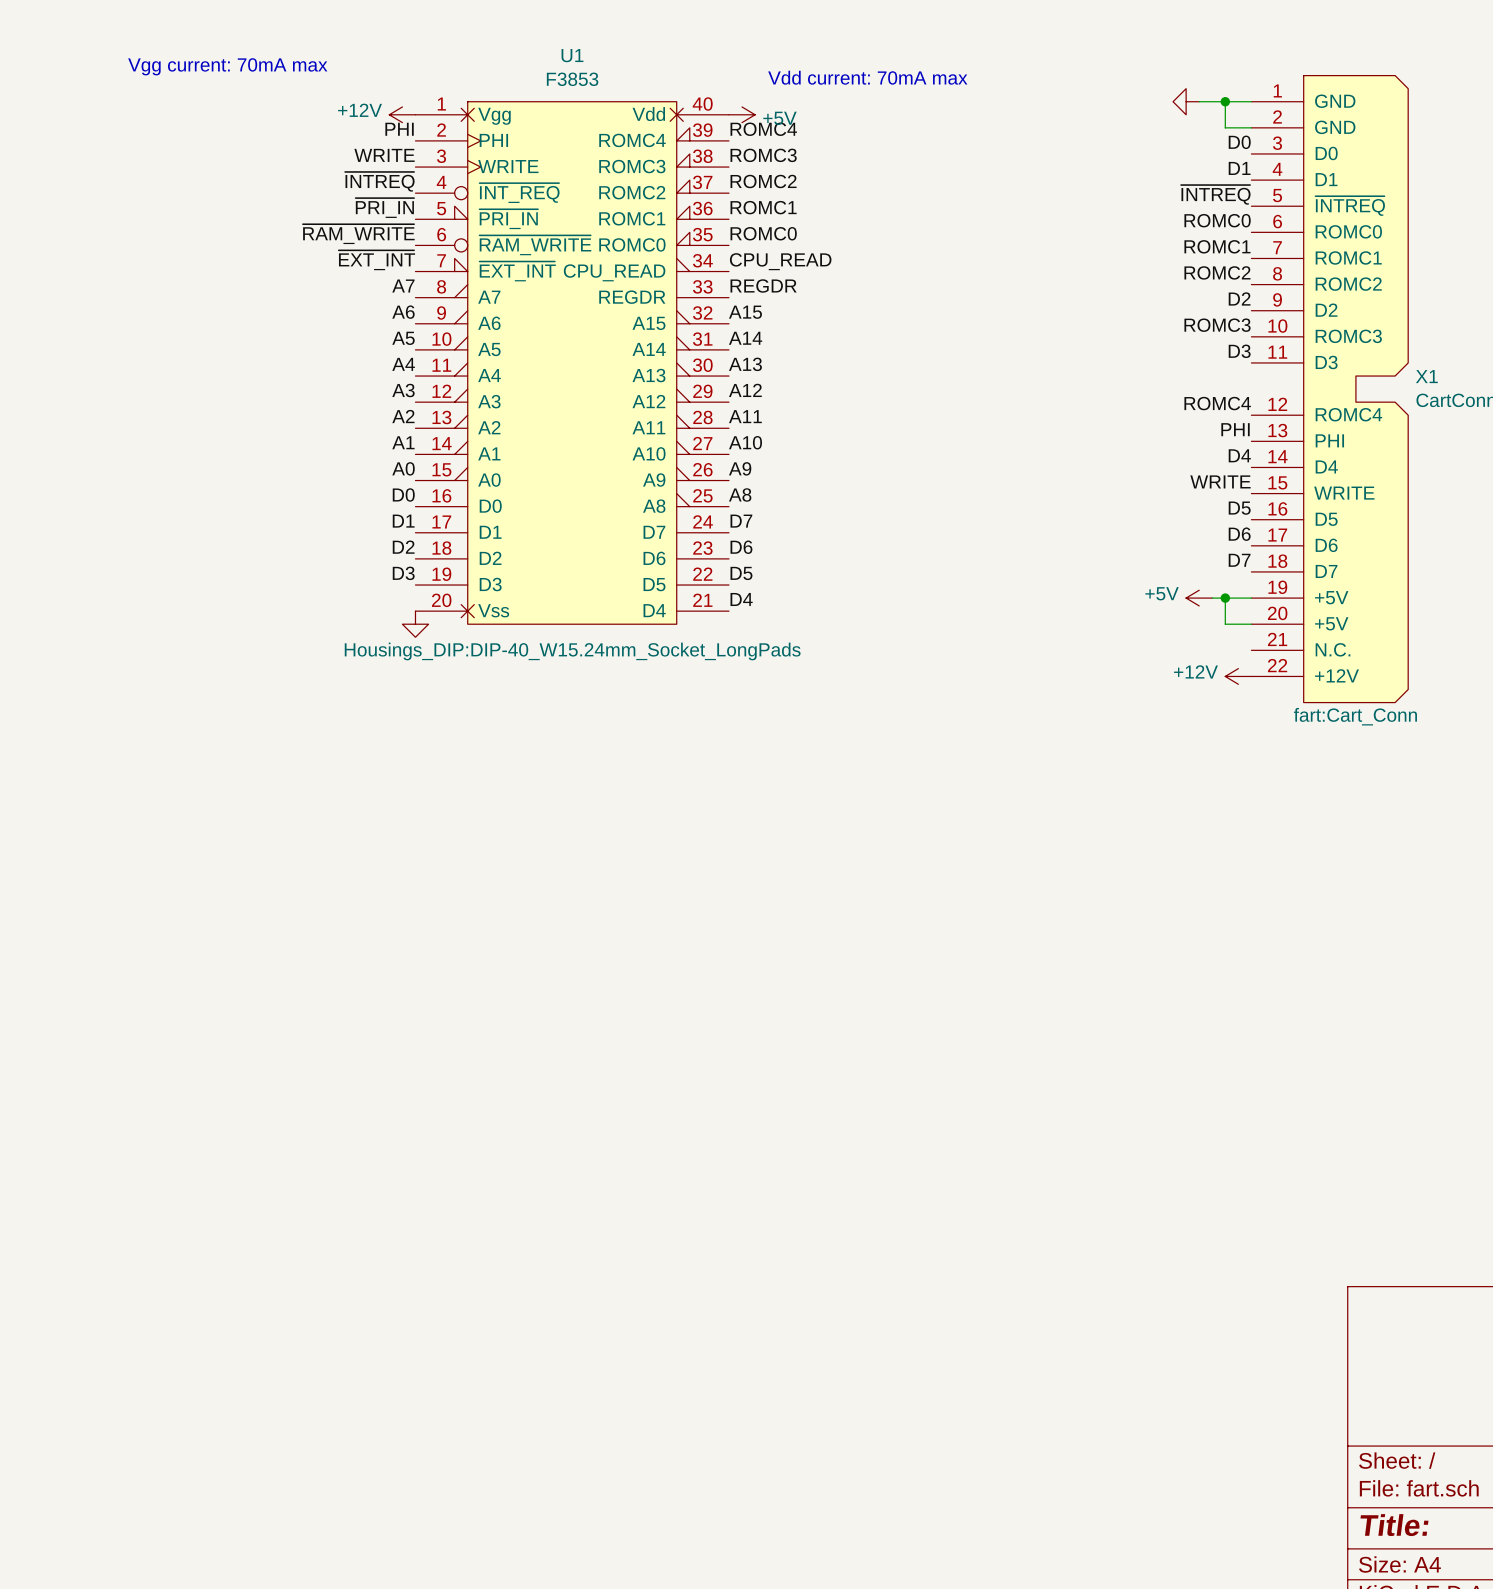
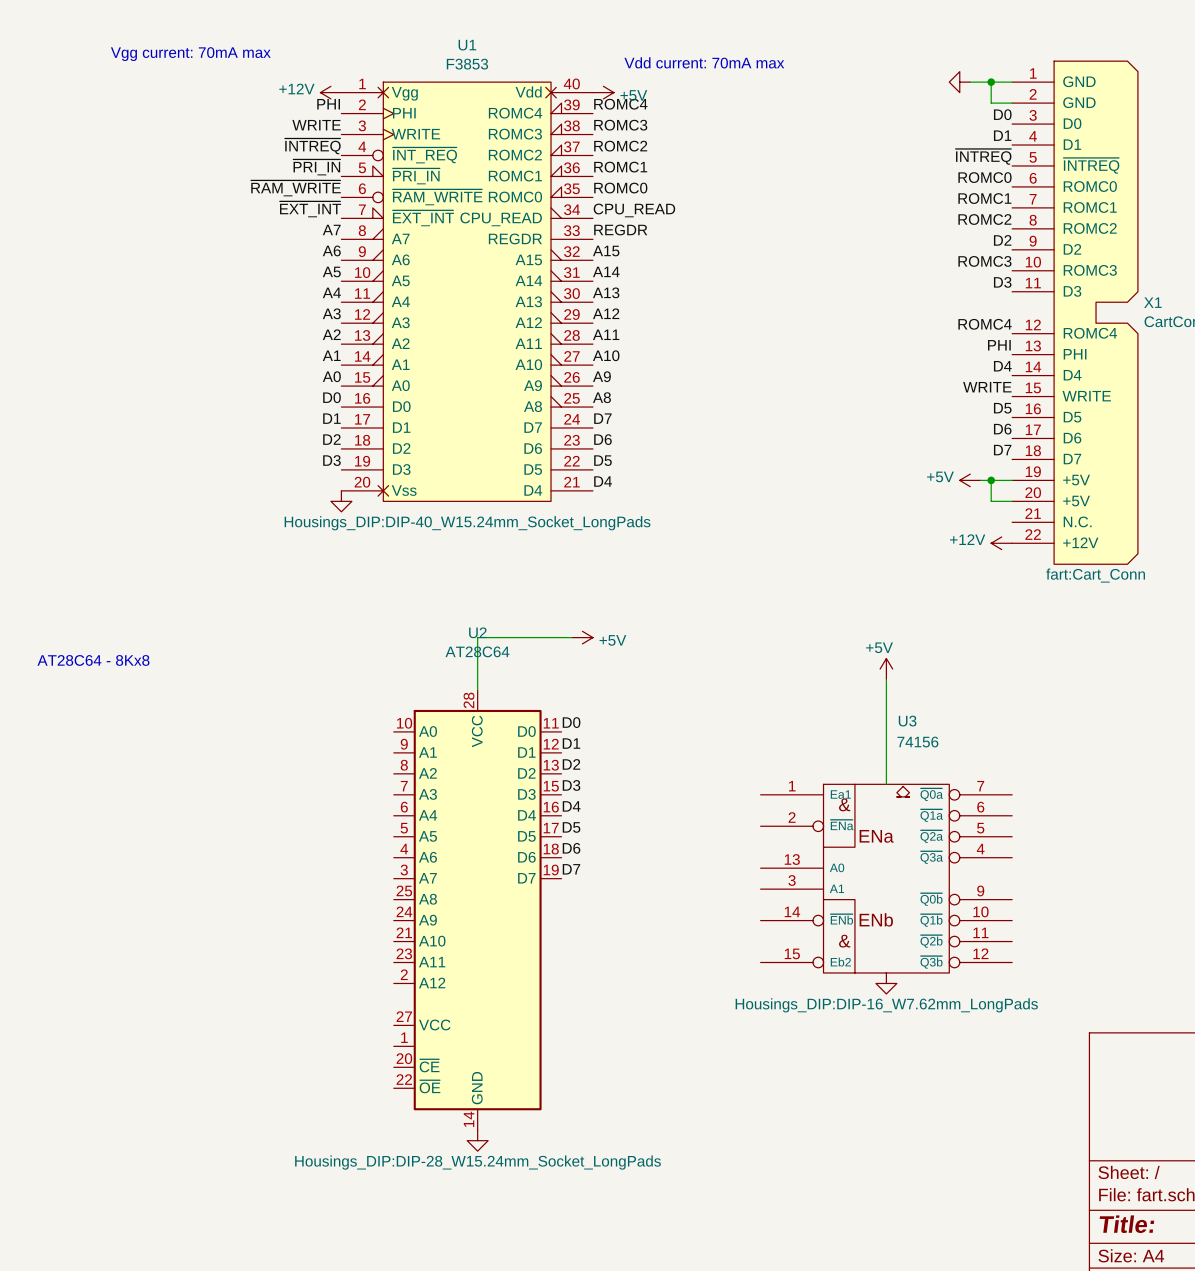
wire: none -> (571, 637) (477, 637) (477, 690)
power symbol: none -> +5V (582, 637)
text: none -> AT28C64 - 8Kx8 (93, 660)
power symbol: none -> +5V (886, 669)
wire: none -> (886, 679) (886, 784)
label: none -> D0 (571, 722)
label: none -> D1 (571, 743)
label: none -> D2 (571, 764)
label: none -> D3 (571, 785)
label: none -> D4 (571, 806)
label: none -> D5 (571, 827)
label: none -> D6 (571, 848)
label: none -> D7 (571, 869)
U3: none -> 74156 (886, 878)
U2: none -> AT28C64 (477, 910)
power symbol: none -> (886, 983)
power symbol: none -> (477, 1140)

